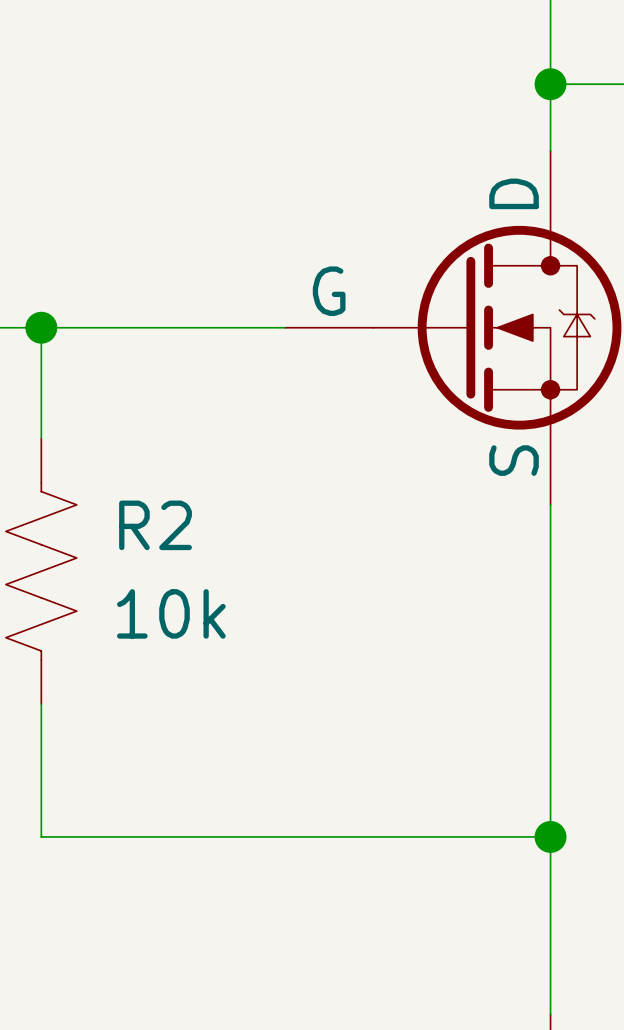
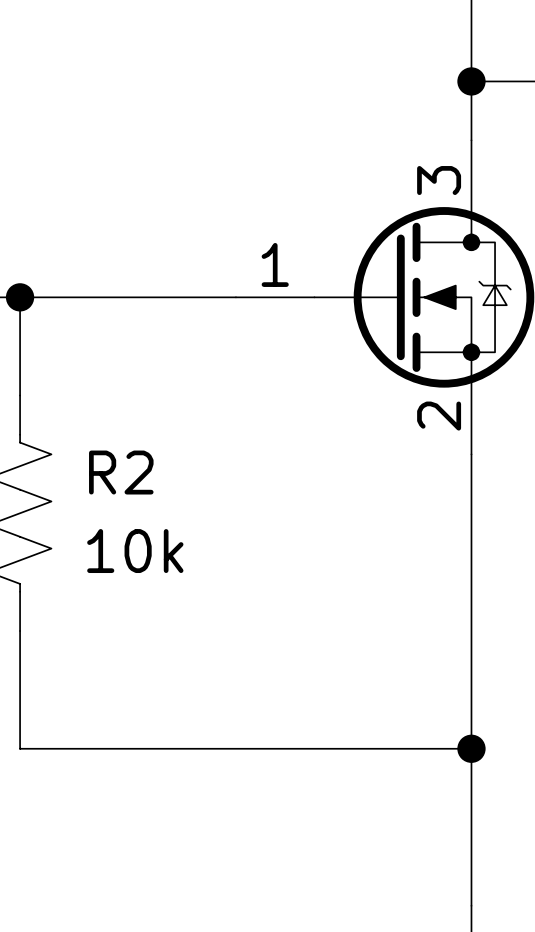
part pin name: D (514, 193) -> none
part pin number: none -> 3 (439, 180)
part pin name: G (329, 291) -> none
part pin number: none -> 1 (275, 264)
part pin name: S (514, 460) -> none
part pin number: none -> 2 (439, 416)

